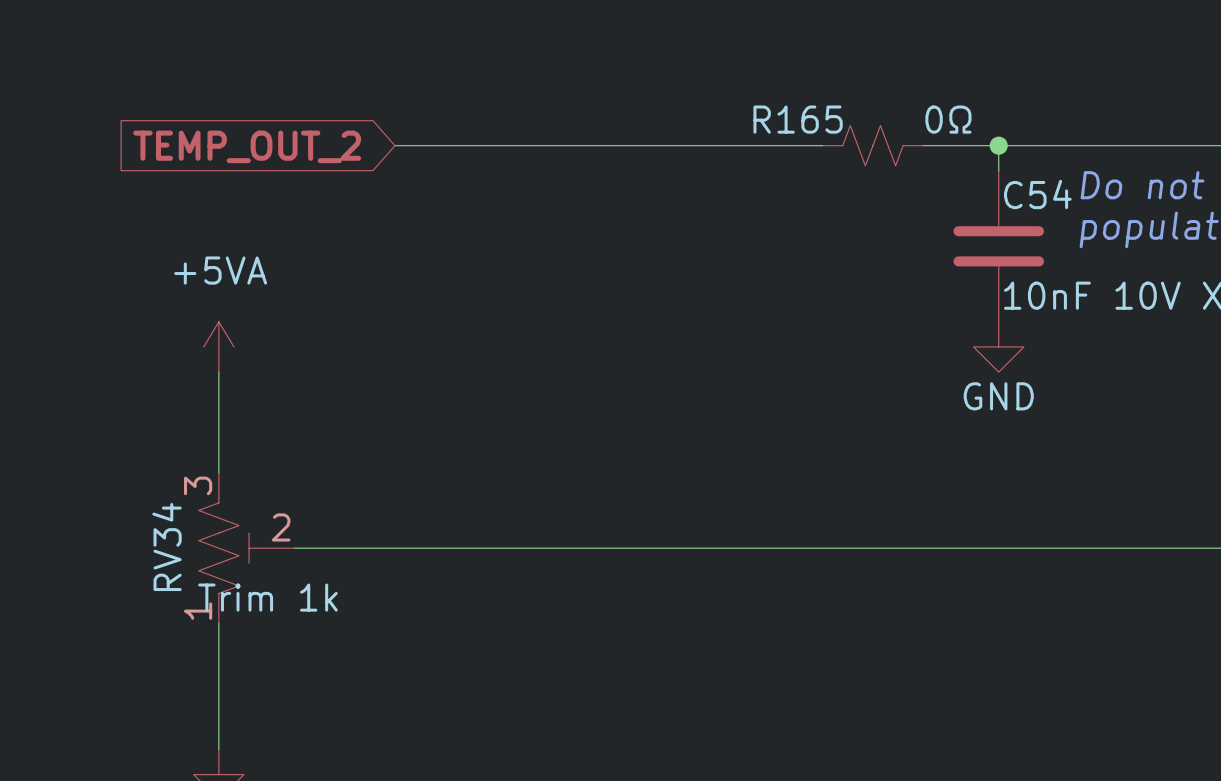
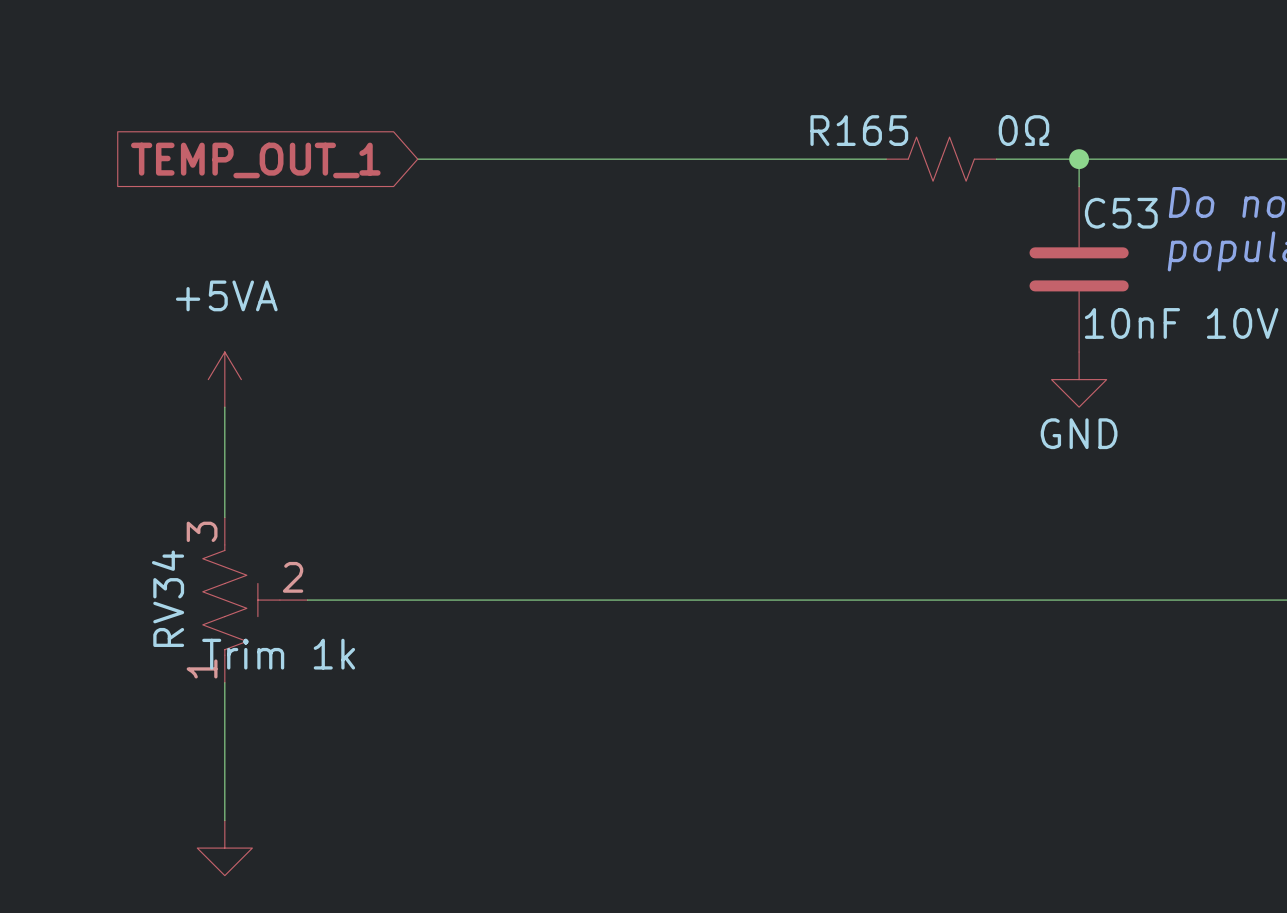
global label: TEMP_OUT_2 (247, 146) -> TEMP_OUT_1 (255, 160)
C54 name: C54 (1037, 194) -> C53 (1121, 213)

